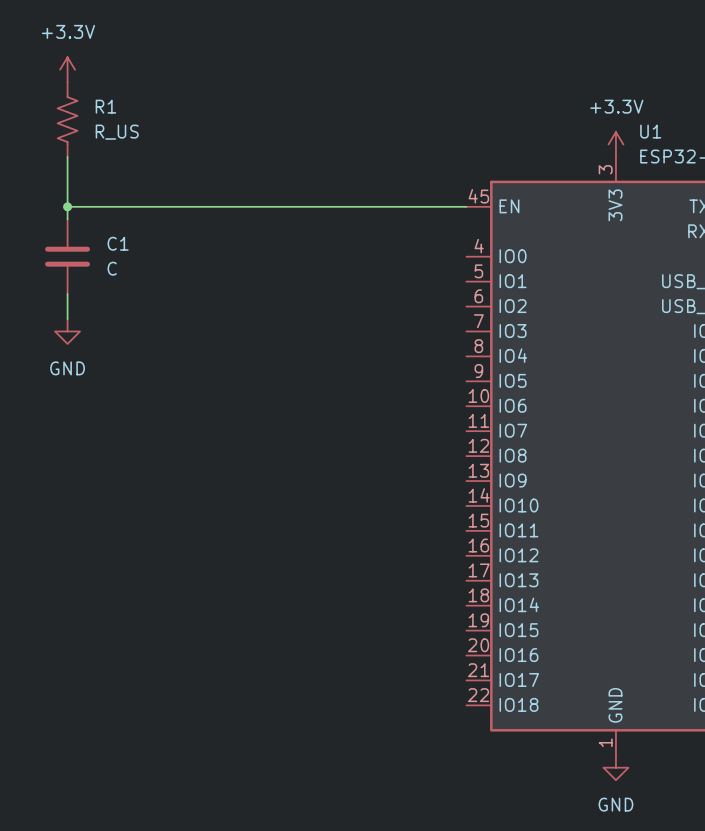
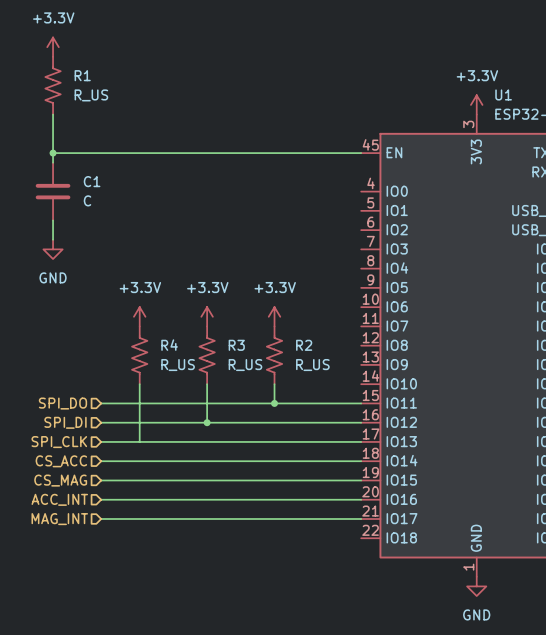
power symbol: none -> +3.3V (139, 316)
power symbol: none -> +3.3V (207, 316)
power symbol: none -> +3.3V (274, 316)
R4: none -> R_US (139, 355)
R3: none -> R_US (207, 355)
R2: none -> R_US (274, 355)
wire: none -> (139, 384) (139, 441)
wire: none -> (207, 384) (207, 422)
wire: none -> (274, 384) (274, 403)
wire: none -> (101, 403) (361, 403)
junction: none -> (274, 403)
hierarchical label: none -> SPI_DO (62, 403)
hierarchical label: none -> SPI_DI (65, 422)
wire: none -> (101, 422) (361, 422)
junction: none -> (207, 422)
hierarchical label: none -> SPI_CLK (59, 442)
wire: none -> (101, 441) (361, 441)
hierarchical label: none -> CS_ACC (61, 461)
wire: none -> (101, 461) (361, 461)
hierarchical label: none -> CS_MAG (60, 480)
wire: none -> (101, 480) (361, 480)
hierarchical label: none -> ACC_INT (59, 499)
wire: none -> (101, 499) (361, 499)
hierarchical label: none -> MAG_INT (59, 519)
wire: none -> (101, 519) (361, 519)

